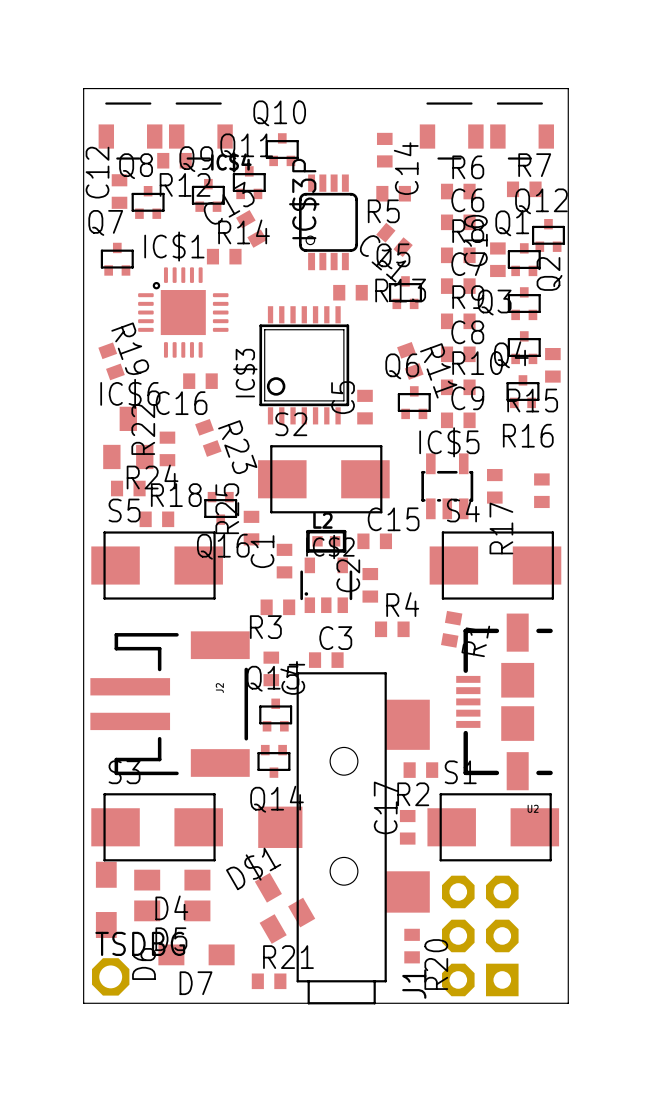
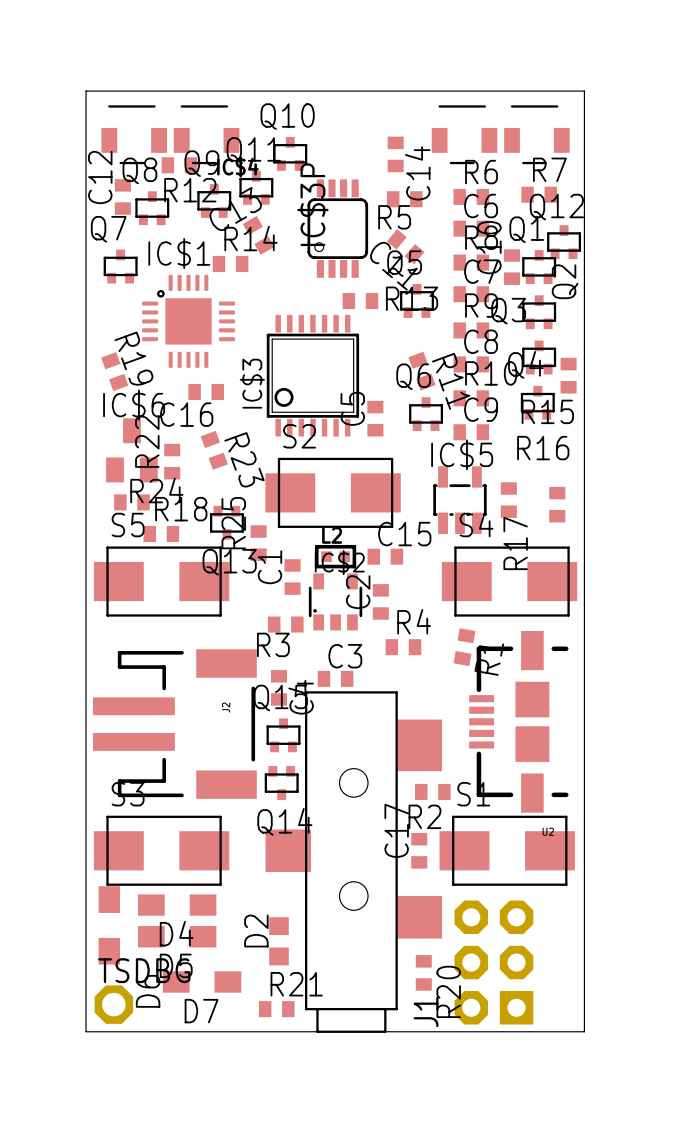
Q16 name: Q16 (223, 546) -> Q13 (229, 562)
D$1: (285, 908) -> none
D2: none -> (278, 941)

